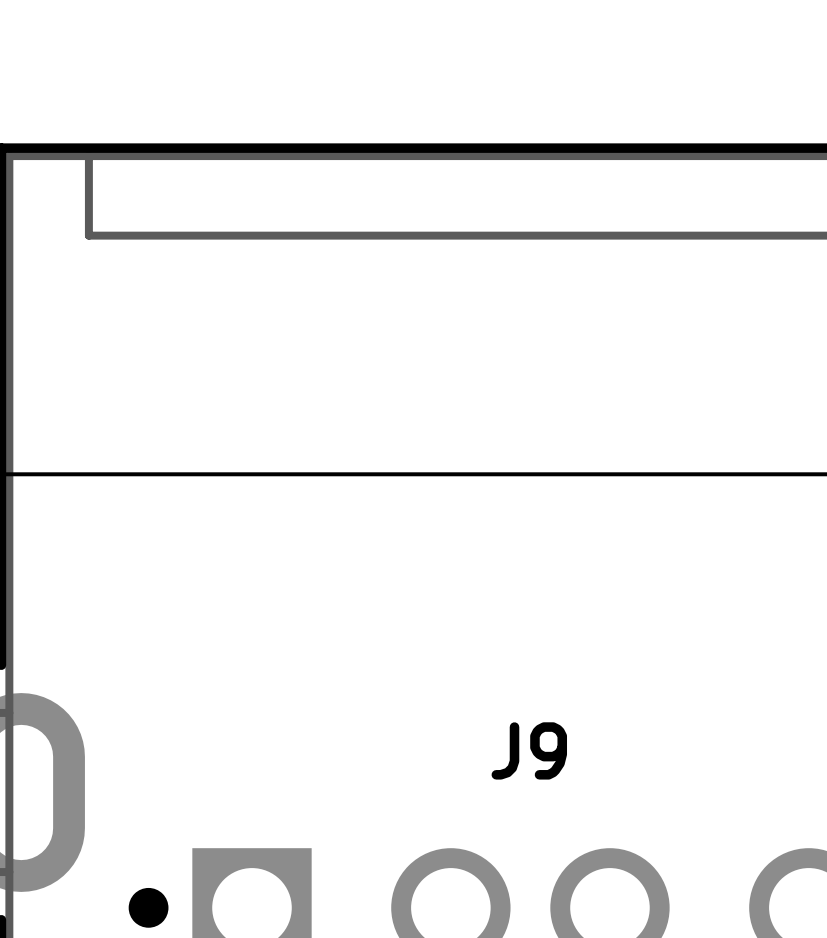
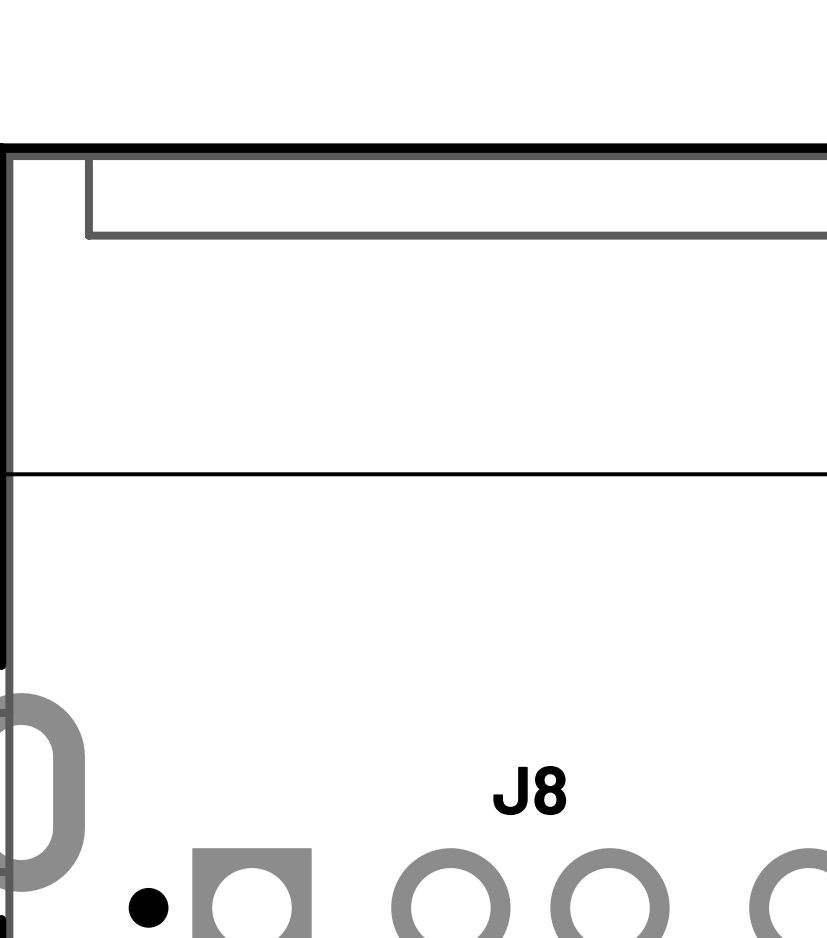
J9 name: J9 (529, 750) -> J8 (529, 790)

